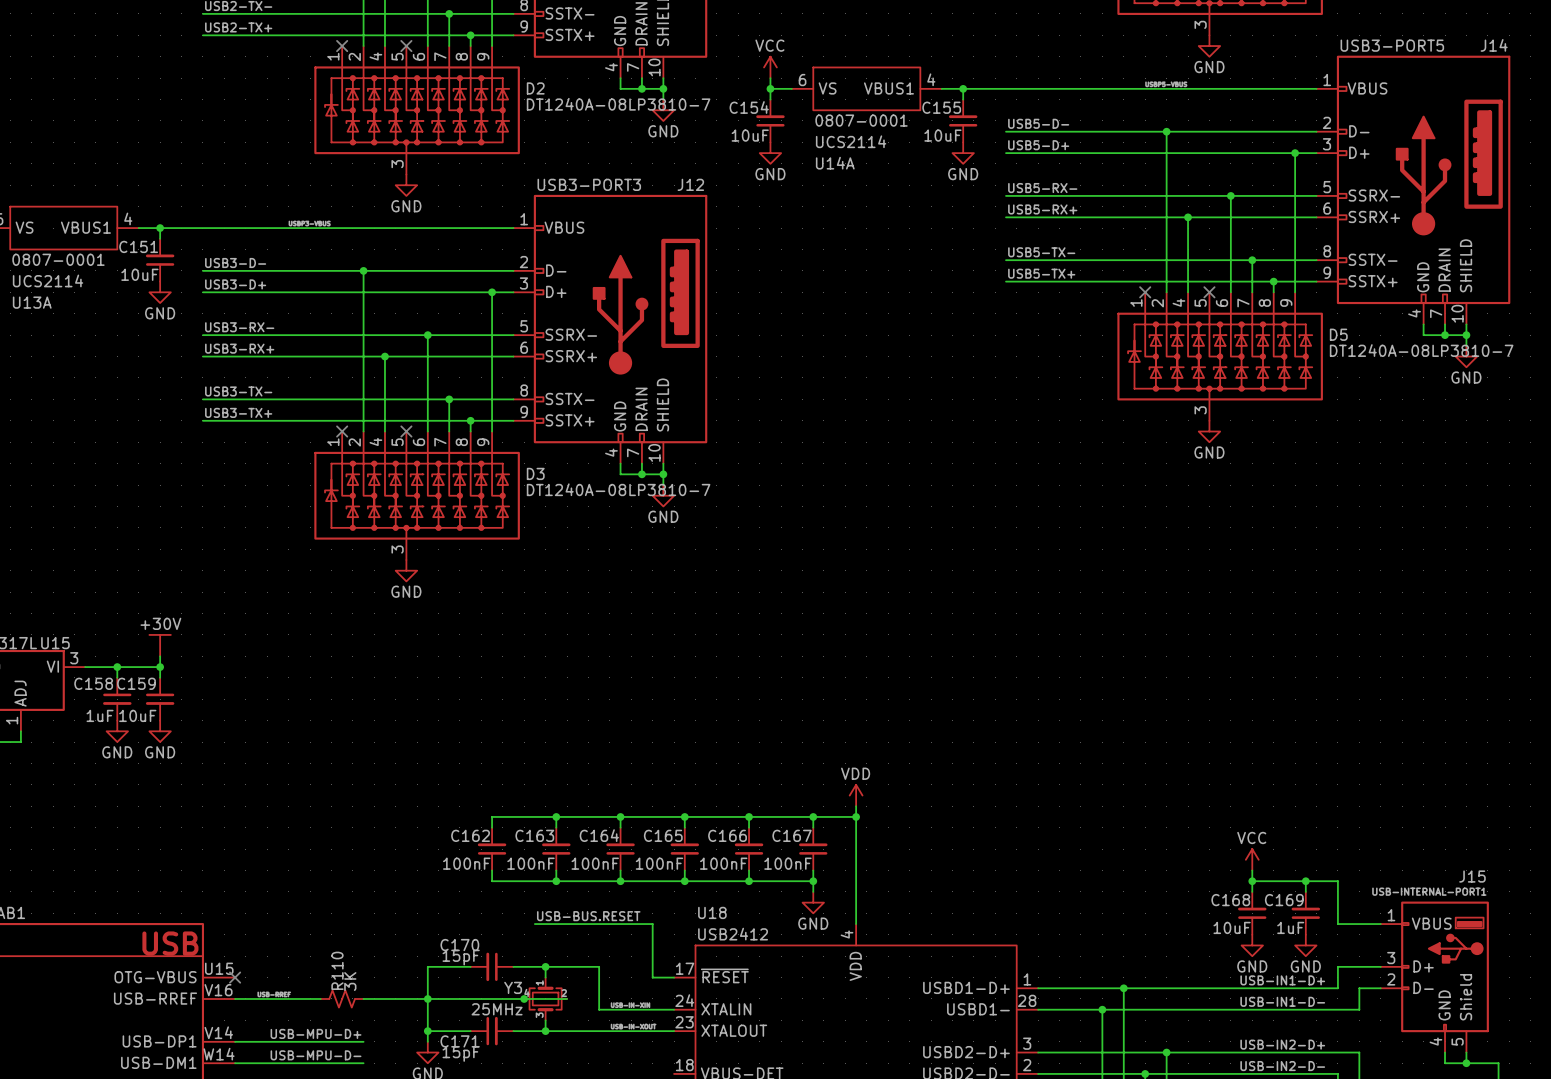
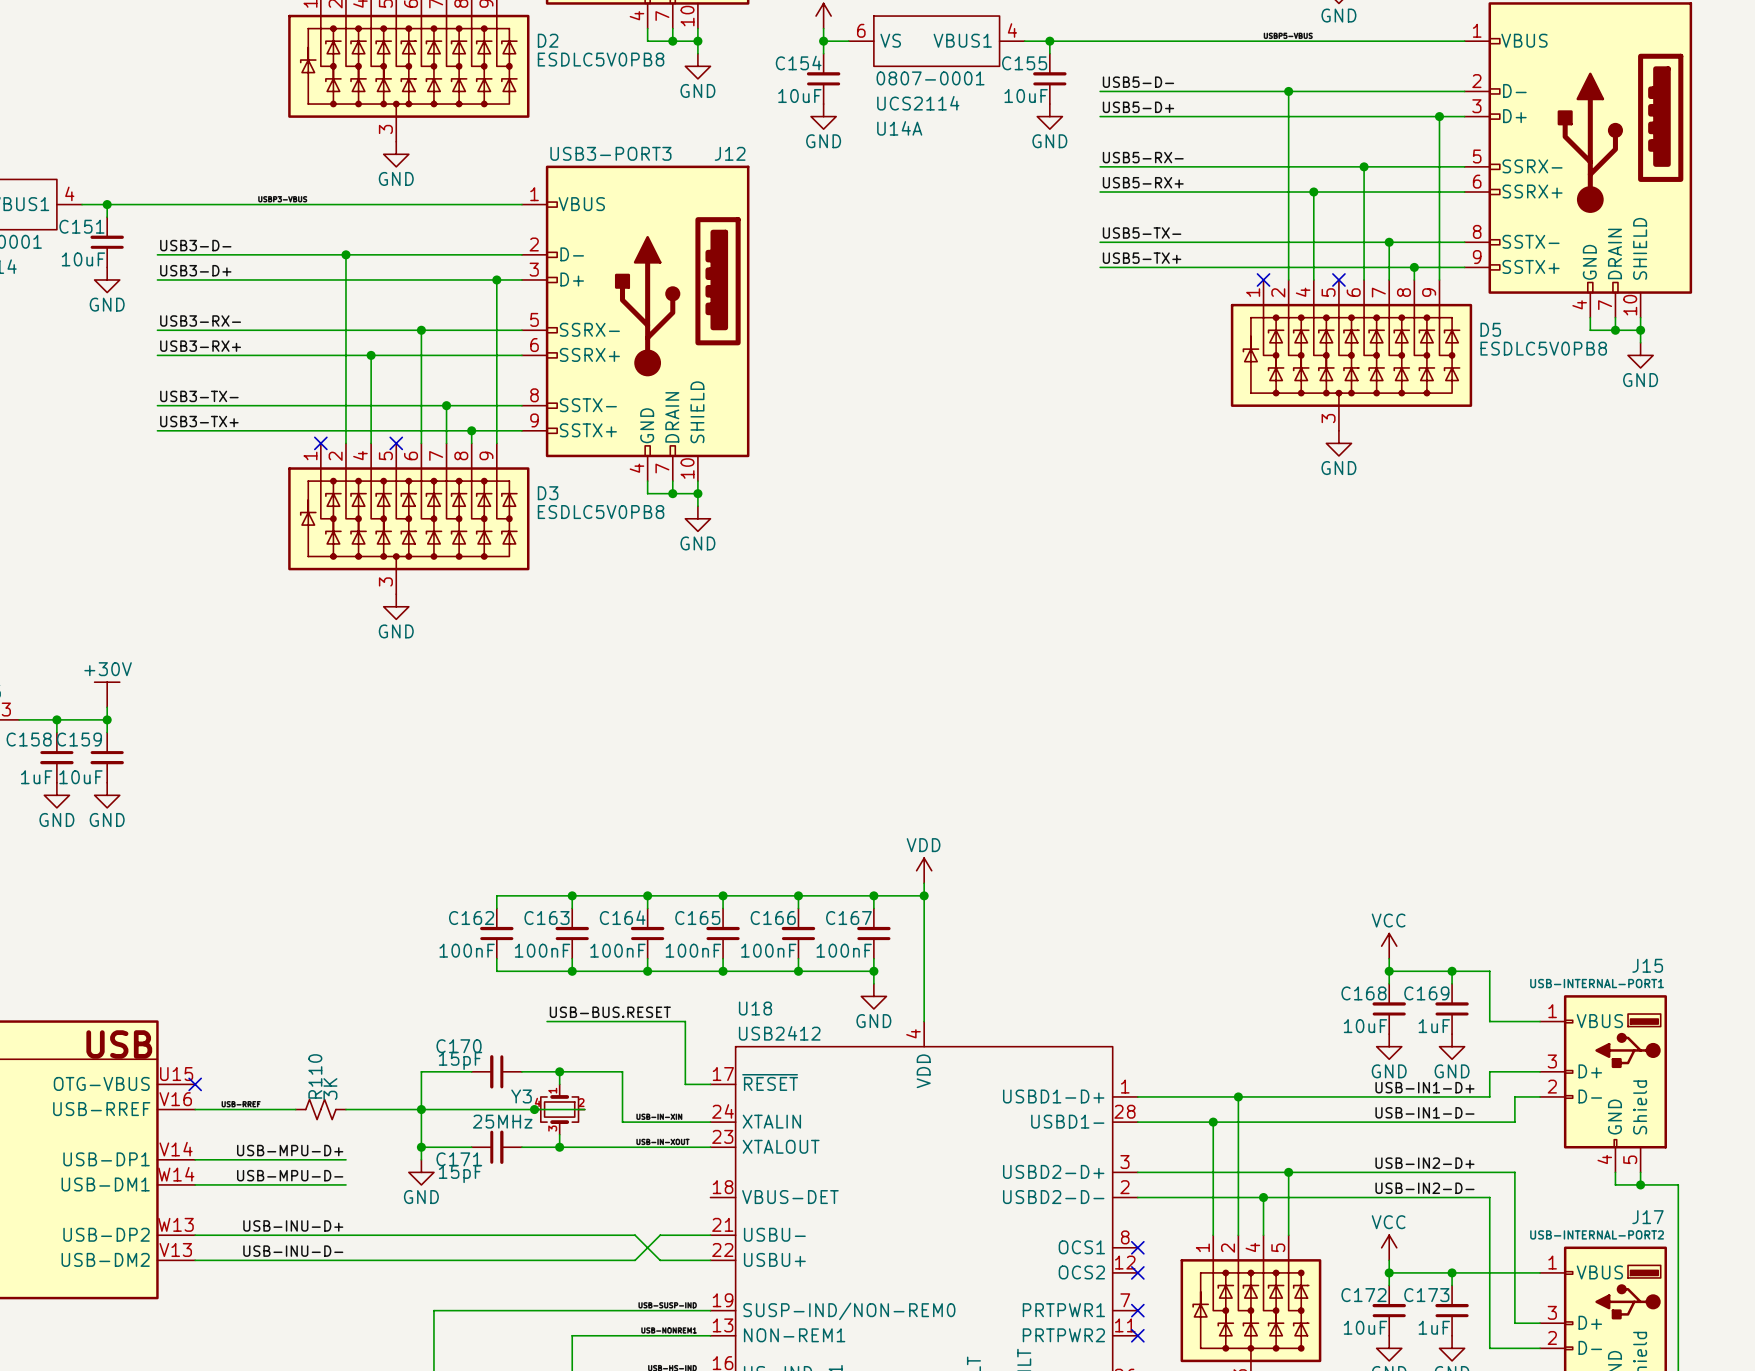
D2 value: DT1240A-08LP3810-7 (618, 104) -> ESDLC5V0PB8 (601, 59)
D5 value: DT1240A-08LP3810-7 (1421, 350) -> ESDLC5V0PB8 (1543, 348)
D3 value: DT1240A-08LP3810-7 (618, 489) -> ESDLC5V0PB8 (601, 512)

